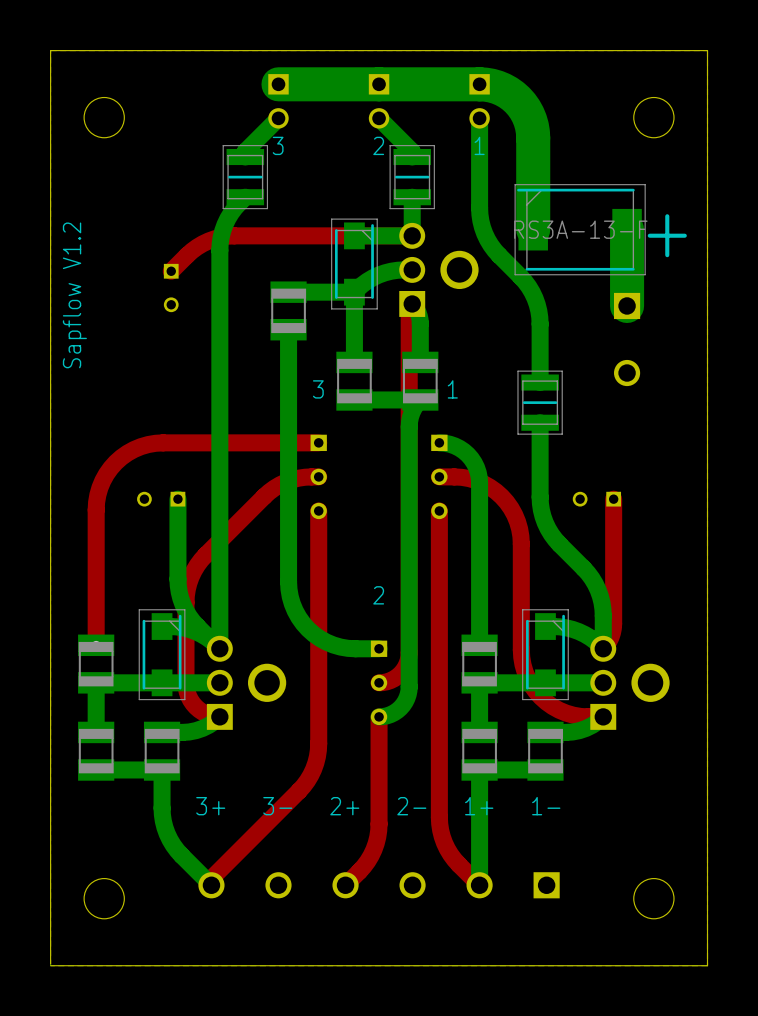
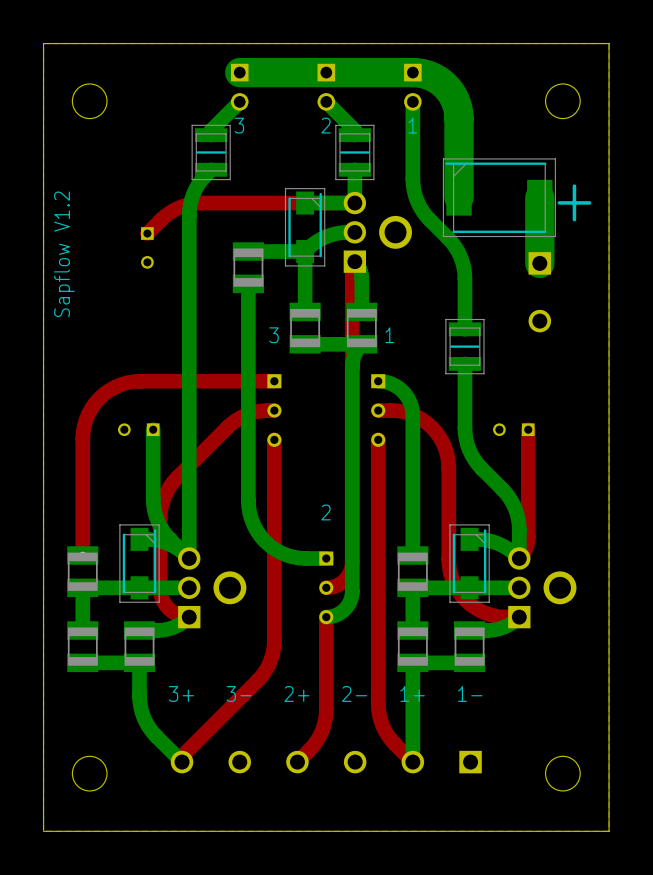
part value: RS3A-13-F (580, 229) -> none

